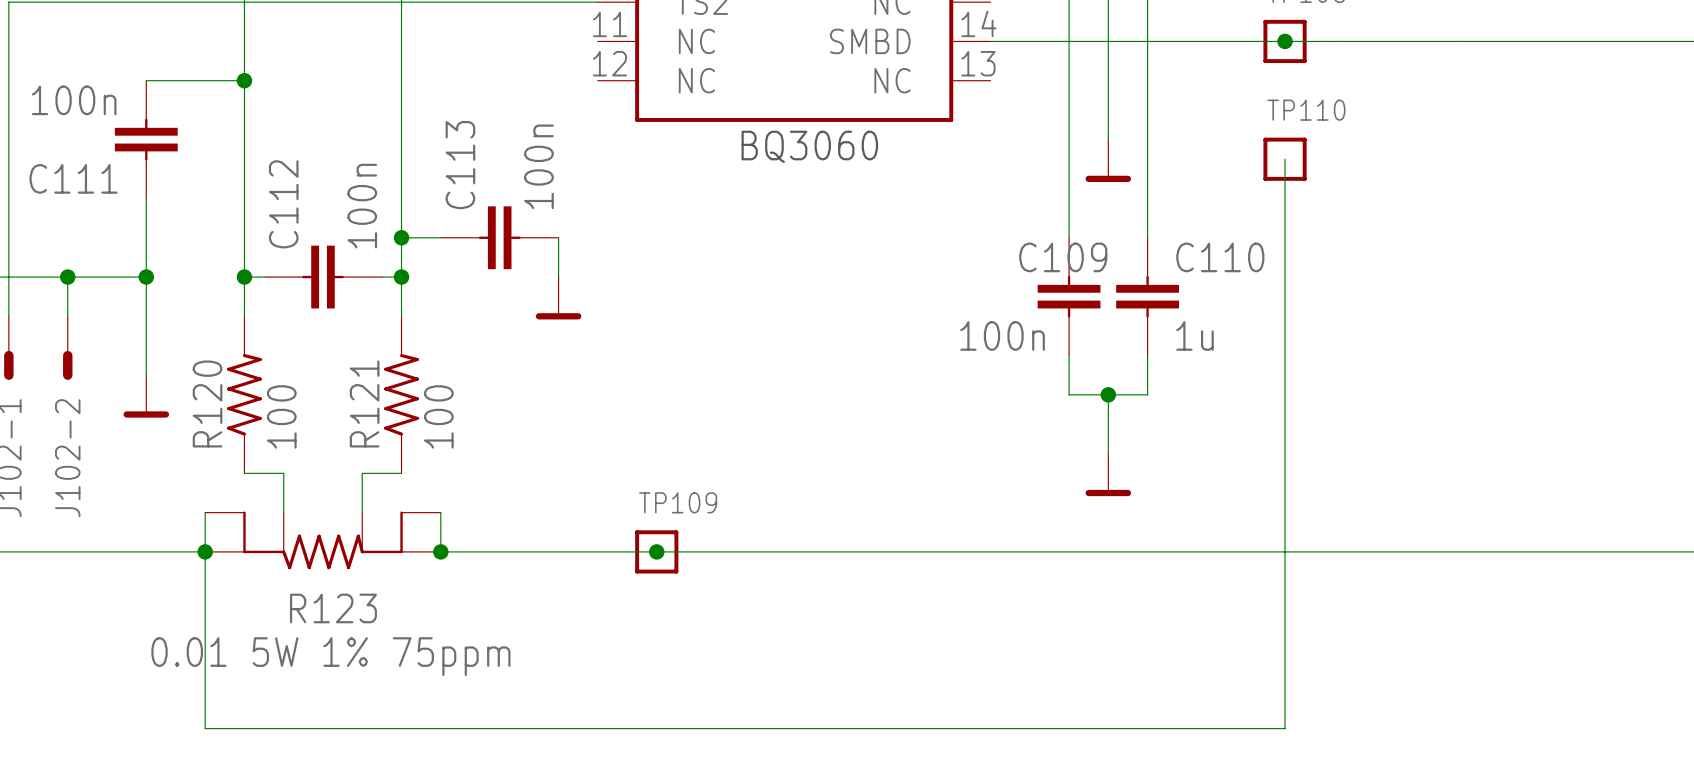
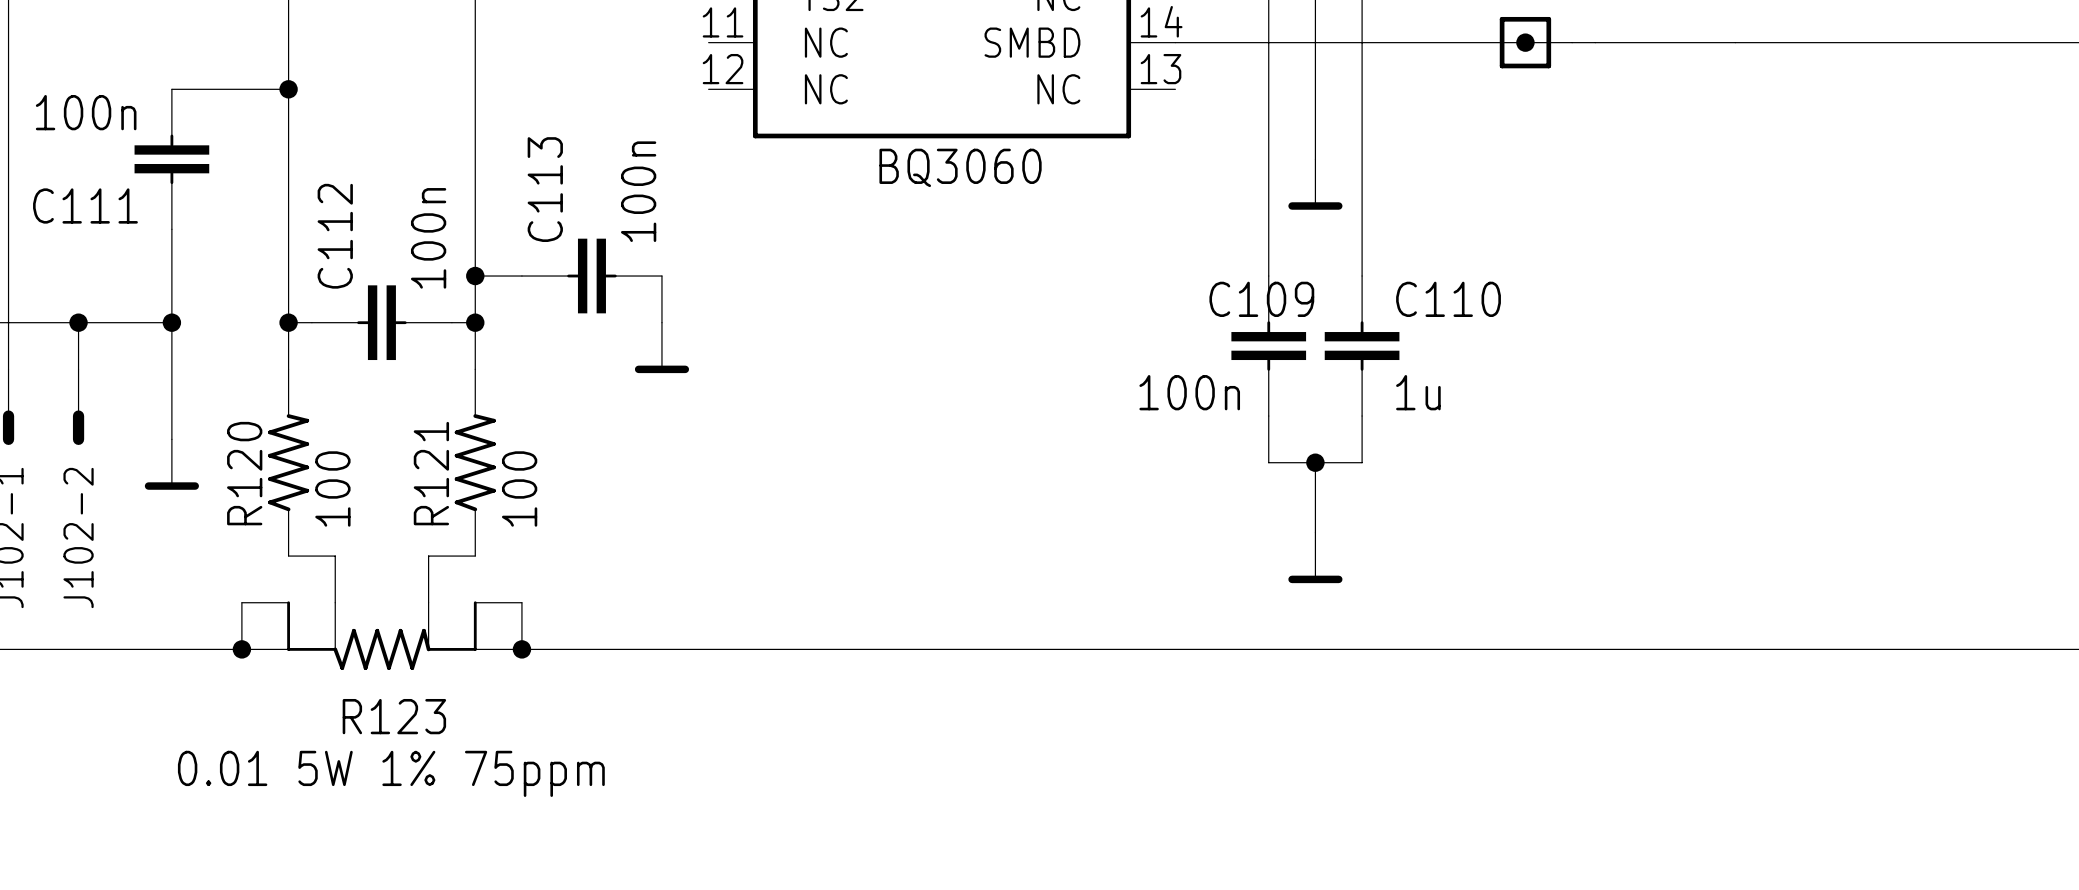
wire: (1285, 159) (1285, 728) (205, 728) (205, 551) -> none
TP110: (1285, 159) -> none
TP109: (656, 551) -> none
junction: (656, 551) -> none

